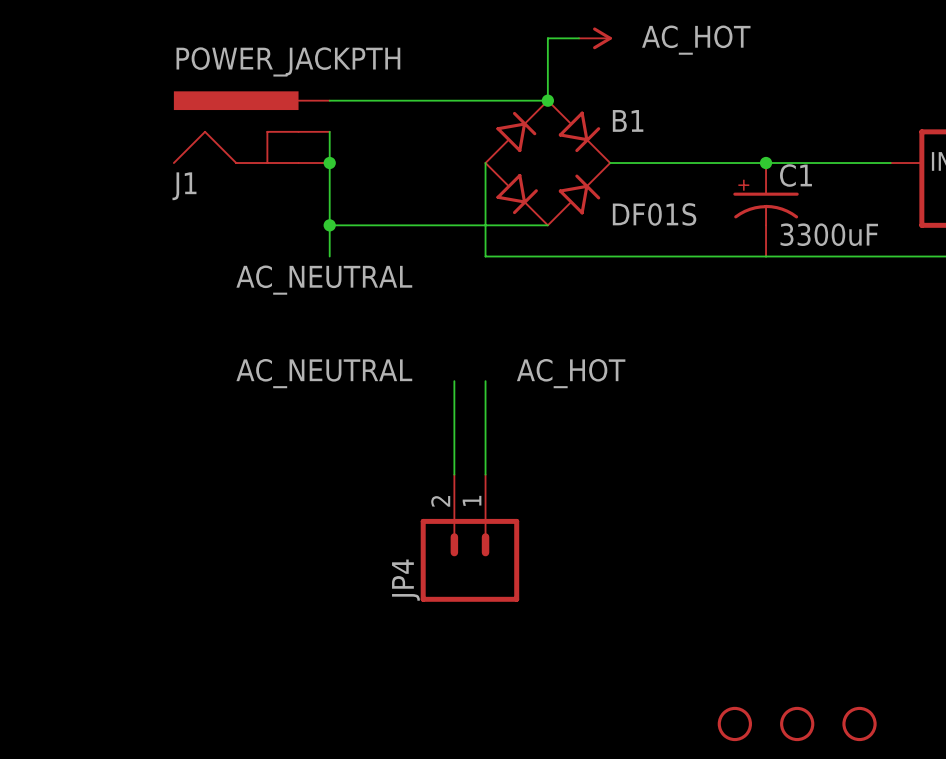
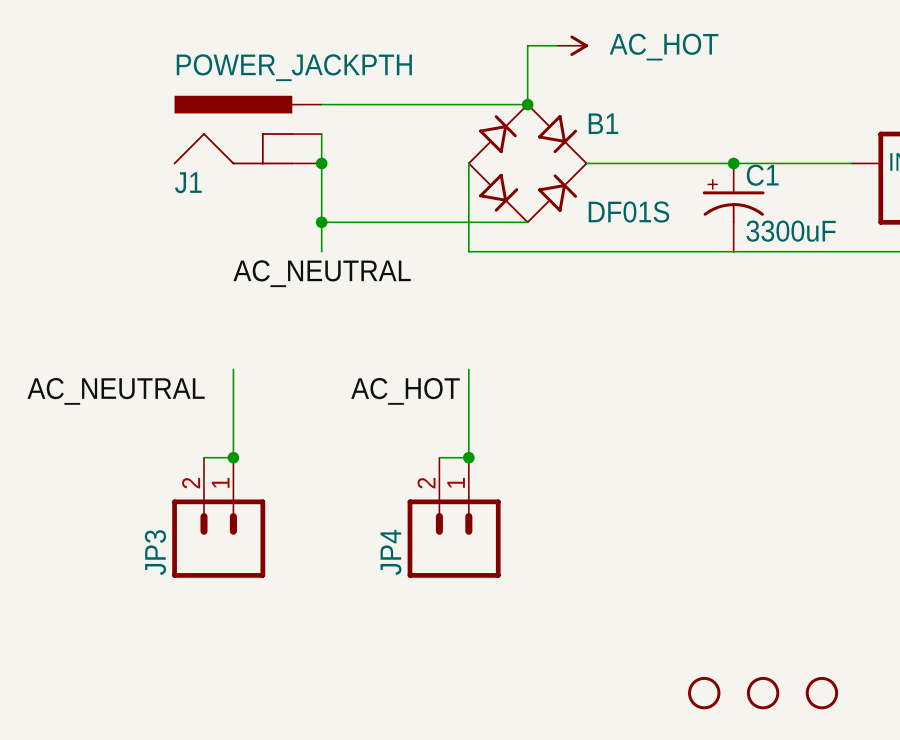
label position: AC_NEUTRAL (324, 373) -> AC_NEUTRAL (116, 391)
label position: AC_HOT (571, 373) -> AC_HOT (405, 391)
wire: none -> (233, 369) (233, 457) (203, 457)
wire: (454, 381) (454, 474) -> (468, 457) (439, 457)
junction: none -> (233, 457)
junction: none -> (468, 457)
JP3: none -> (218, 517)

